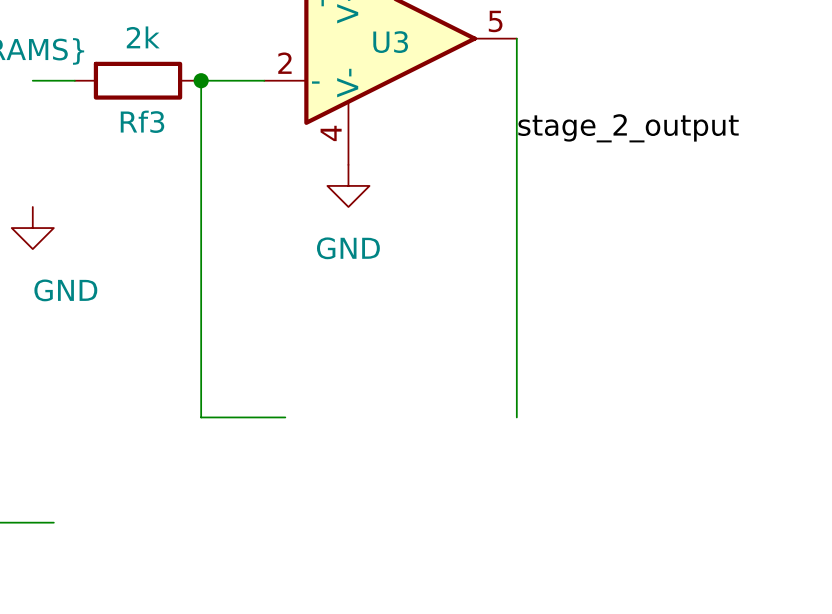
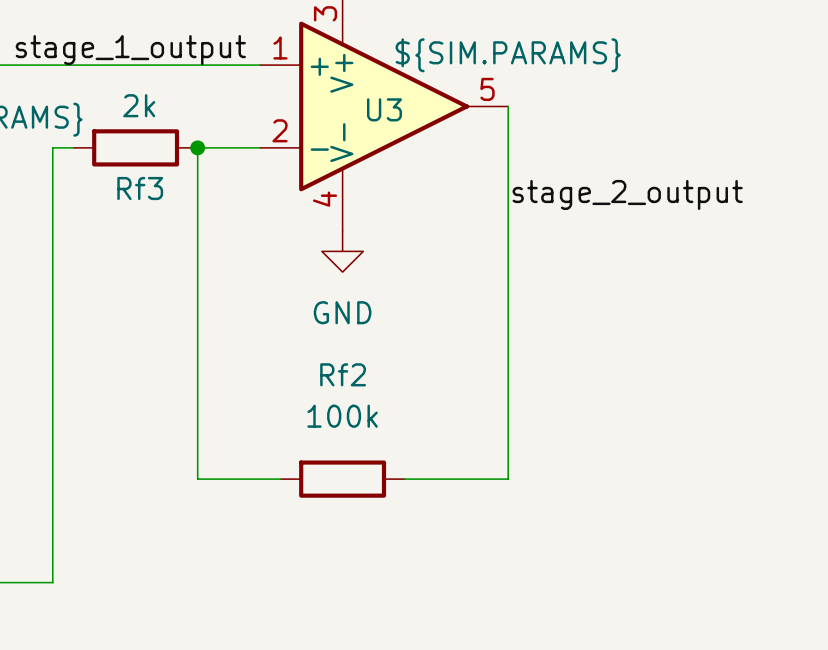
wire: (32, 80) (53, 80) -> (52, 582) (52, 147)
power symbol: GND (32, 228) -> none
Rf2: none -> 100k (342, 479)
wire: none -> (404, 479) (508, 479)

